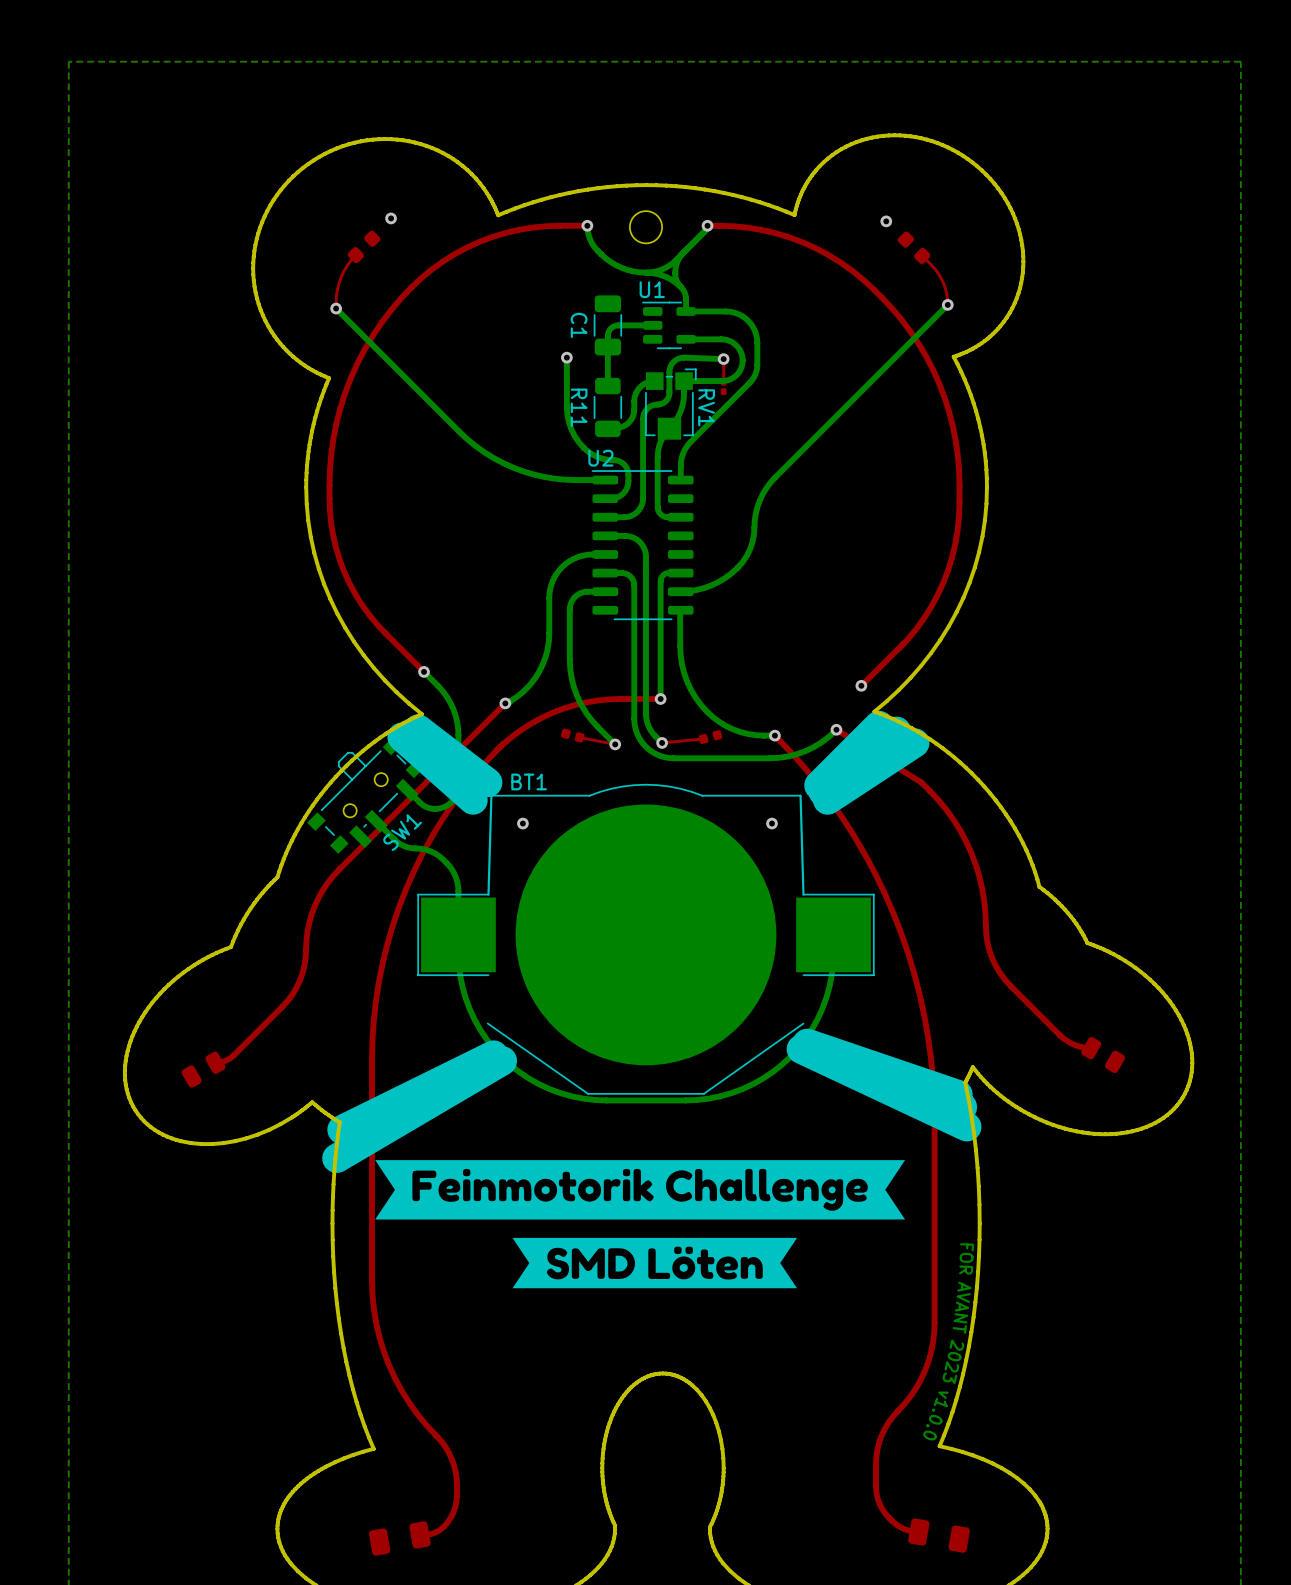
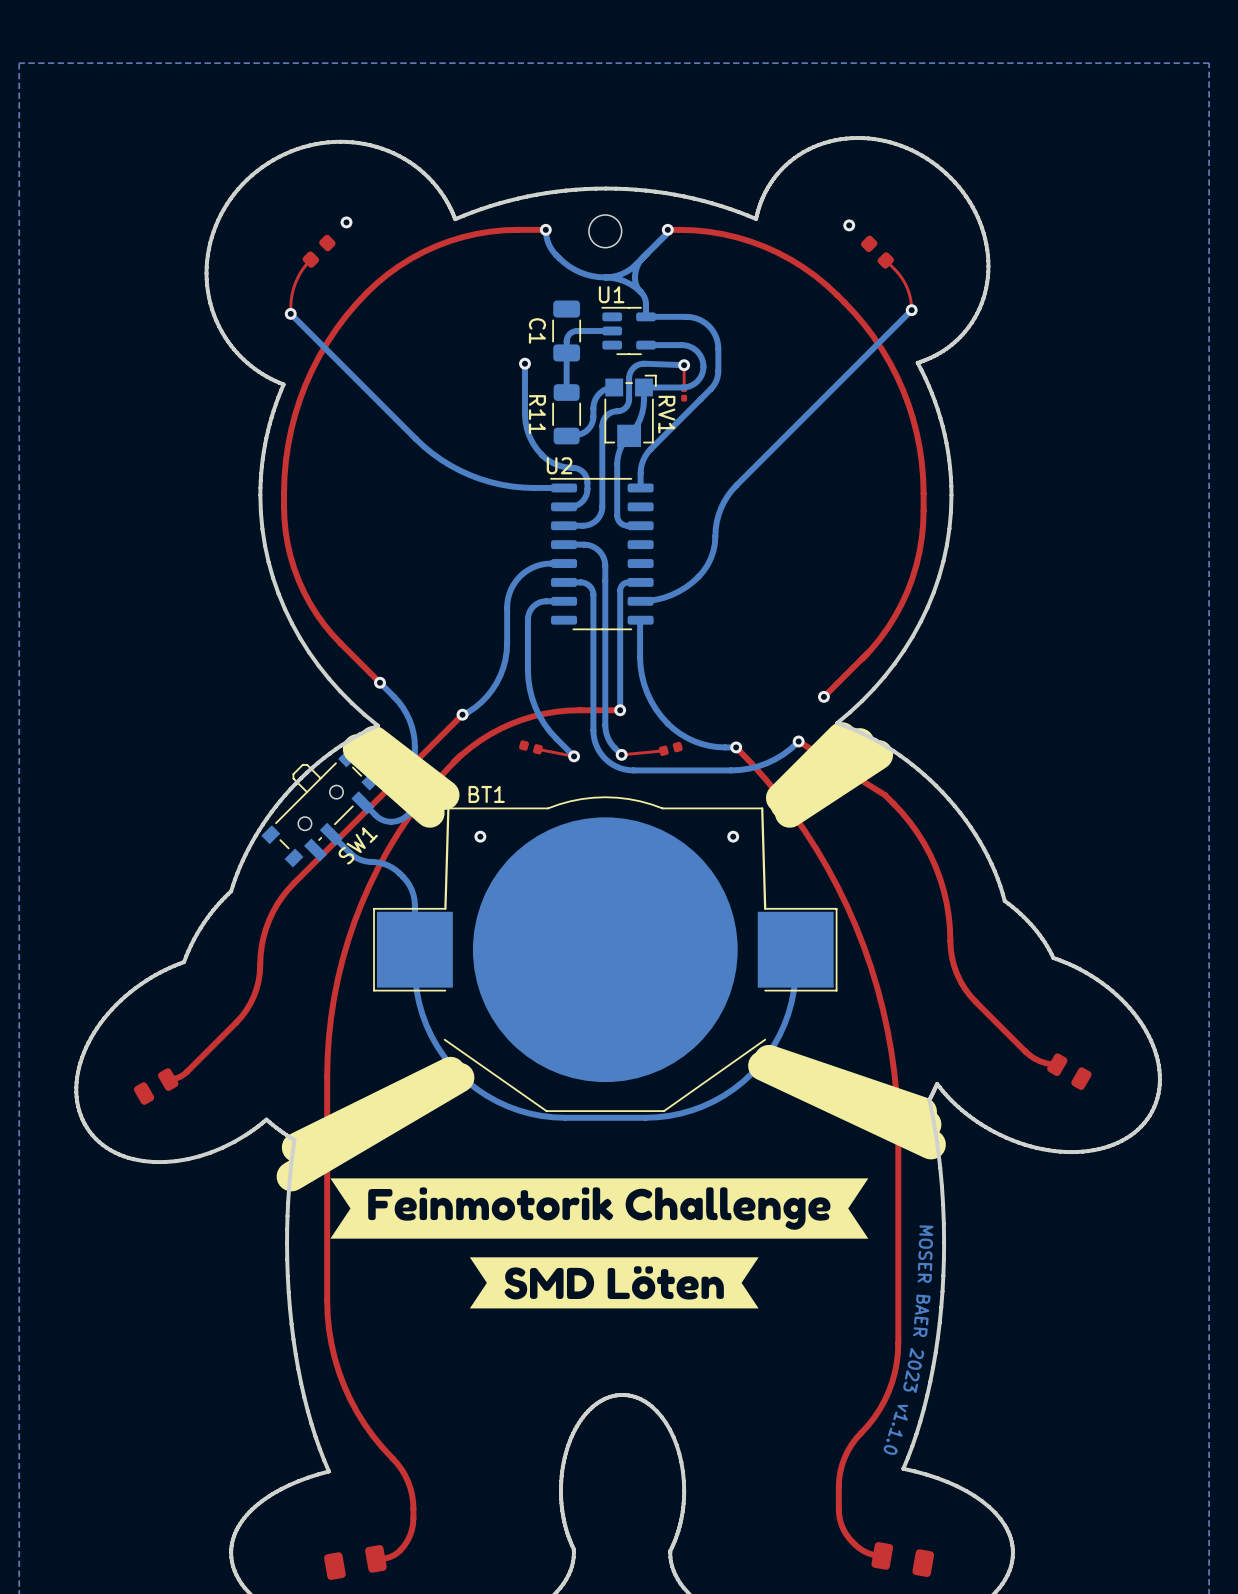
text: none -> MOSER (925, 1254)
text: FOR (966, 1258) -> none
text: AVANT (962, 1307) -> BAER (921, 1315)
text rotation: 0° (953, 1361) -> 2° counterclockwise (913, 1370)
text: v1.0.0 (935, 1416) -> v1.1.0 (895, 1429)

